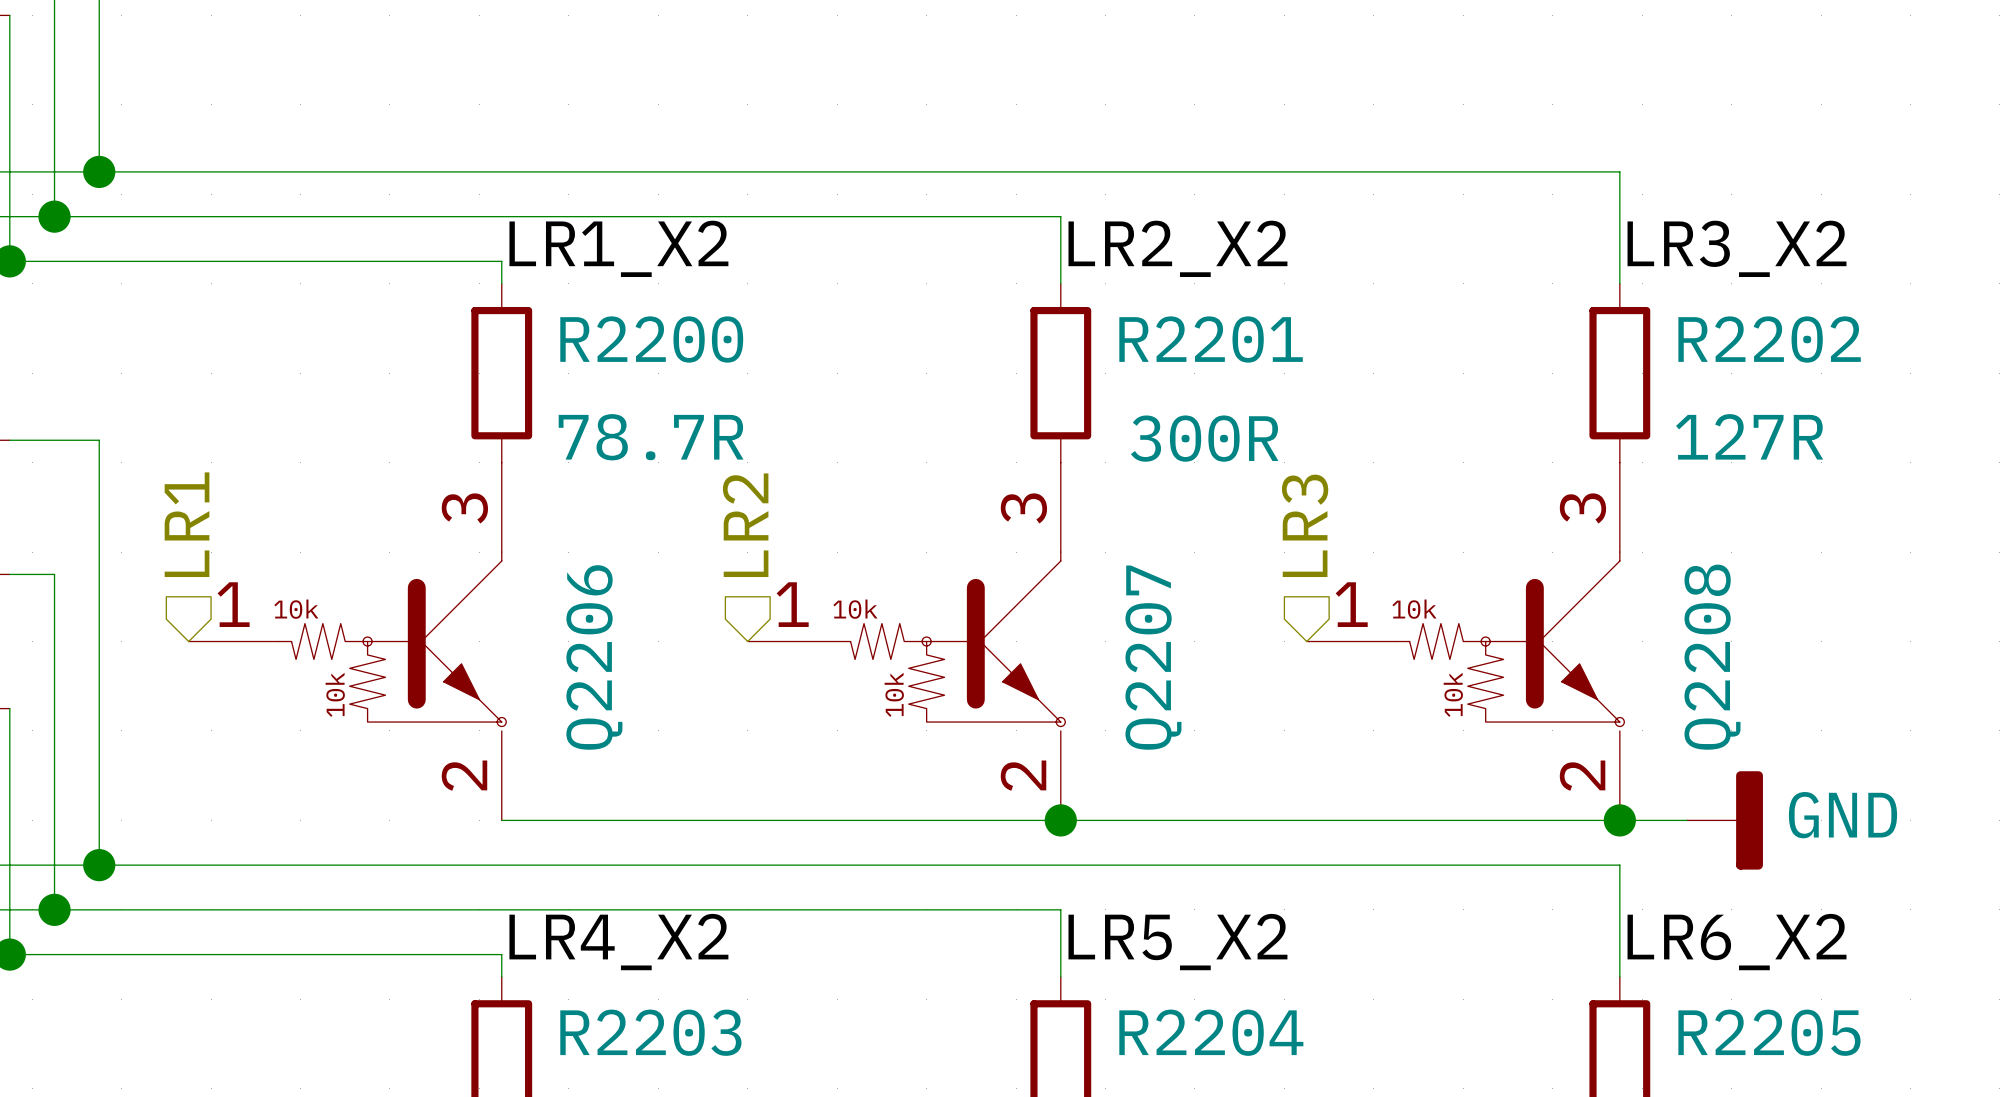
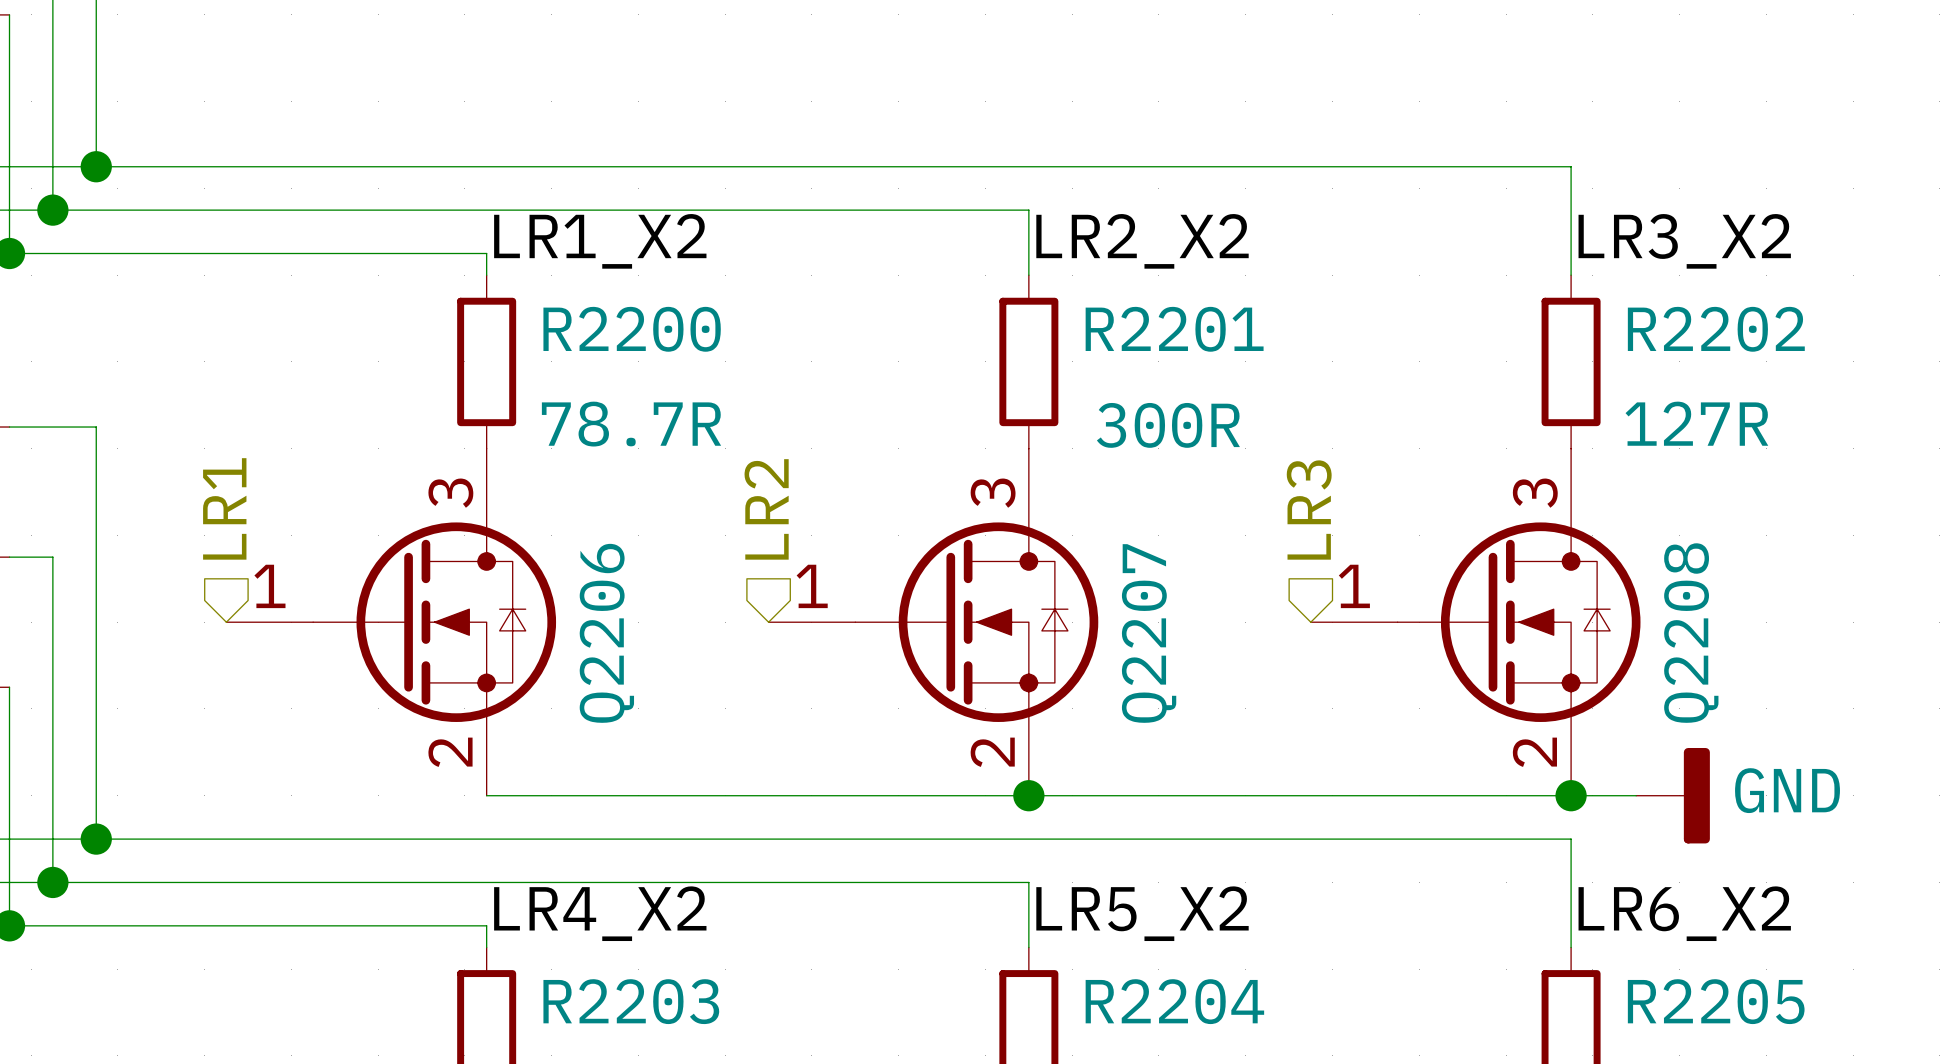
Q2206 symbol: [188, 462, 507, 821] -> [226, 448, 557, 796]
Q2207 symbol: [747, 462, 1066, 821] -> [768, 448, 1099, 796]
Q2208 symbol: [1306, 462, 1625, 821] -> [1310, 448, 1641, 796]
hierarchical label position: LR1 (187, 524) -> LR1 (224, 508)
hierarchical label position: LR2 (745, 525) -> LR2 (766, 509)
hierarchical label position: LR3 (1305, 525) -> LR3 (1309, 510)

